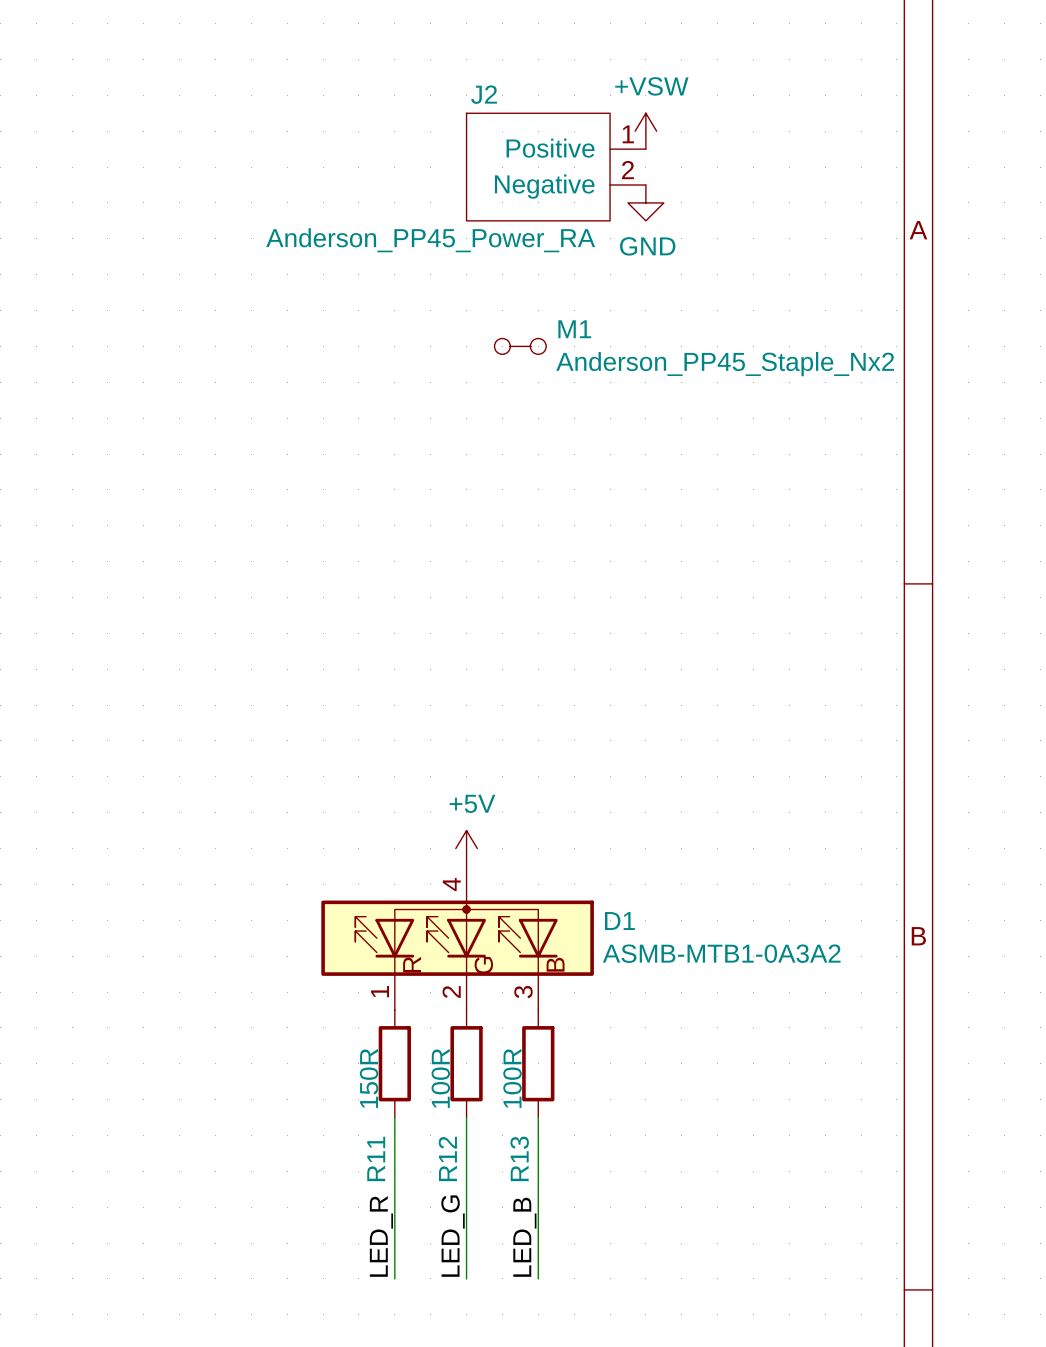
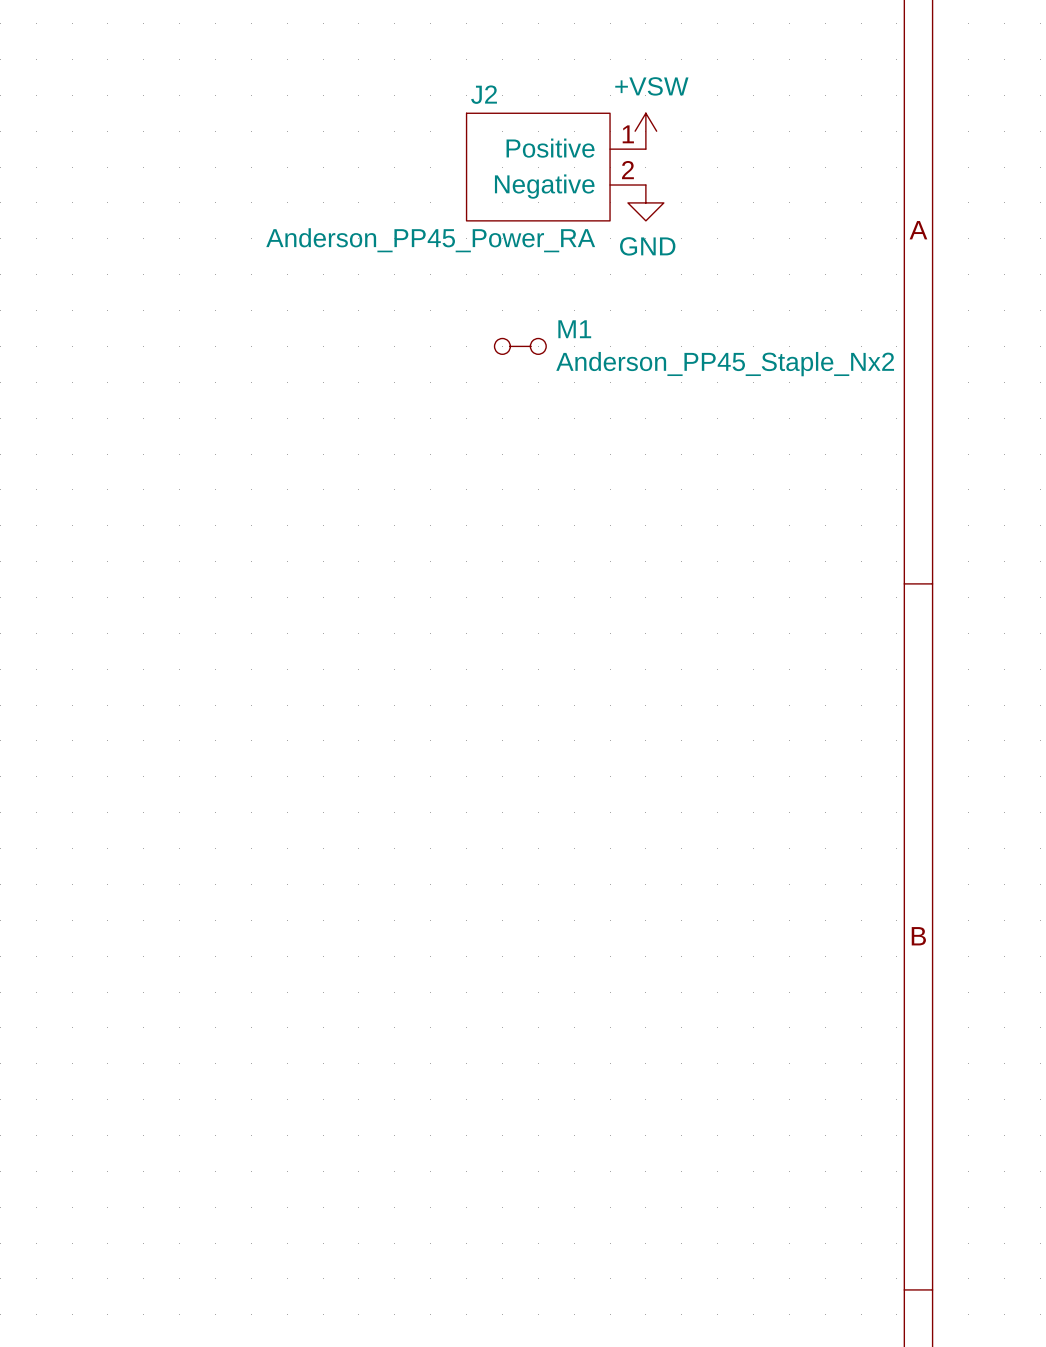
power symbol: +5V (466, 848) -> none
D1: ASMB-MTB1-0A3A2 (457, 938) -> none
R11: 150R (394, 1063) -> none
R12: 100R (466, 1063) -> none
R13: 100R (538, 1063) -> none
wire: (394, 1117) (394, 1278) -> none
wire: (466, 1117) (466, 1278) -> none
wire: (538, 1117) (538, 1278) -> none
label: LED_R (381, 1236) -> none
label: LED_G (453, 1236) -> none
label: LED_B (524, 1237) -> none

